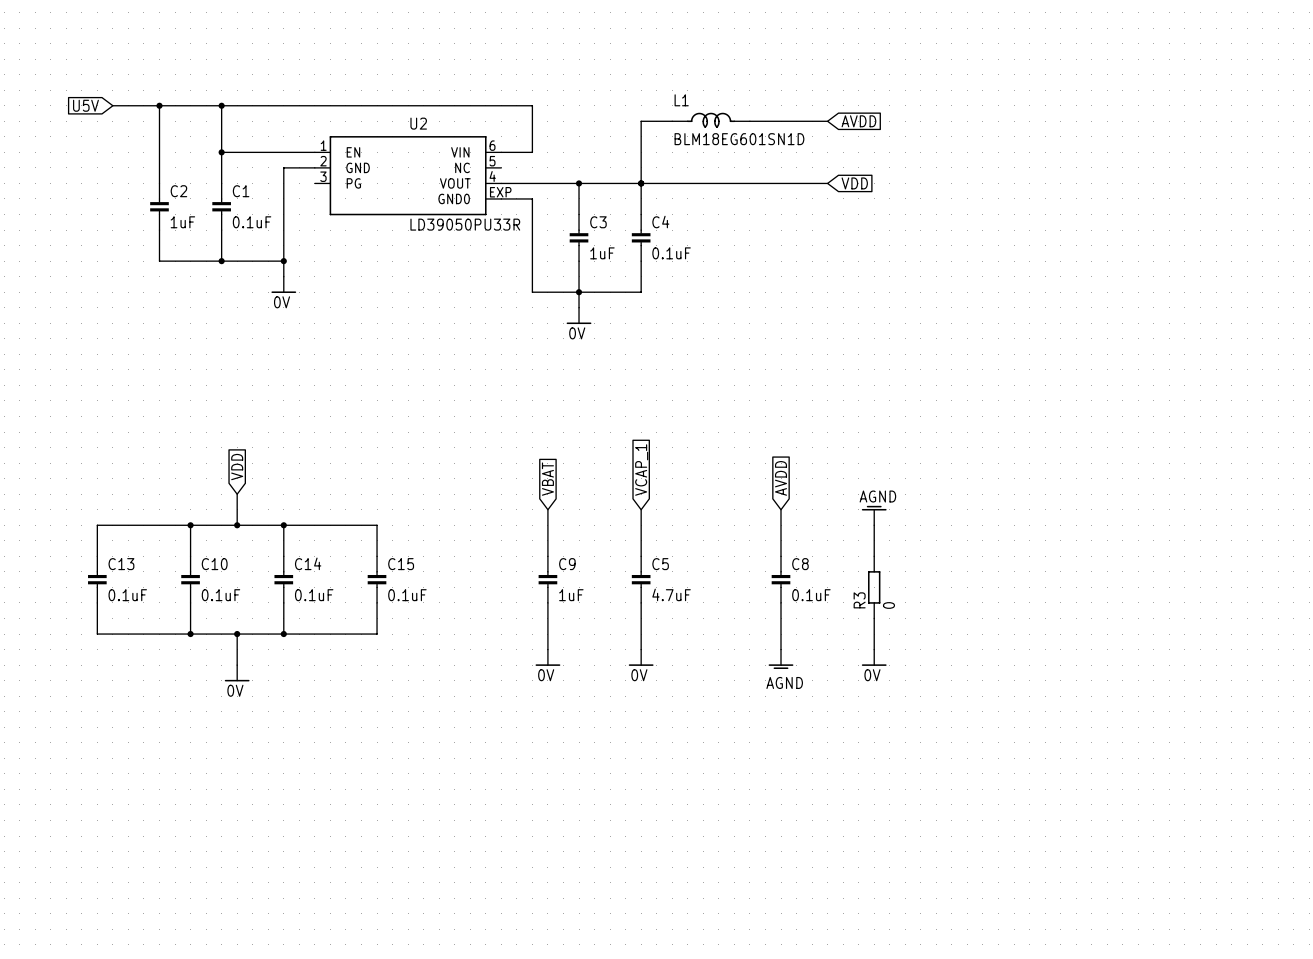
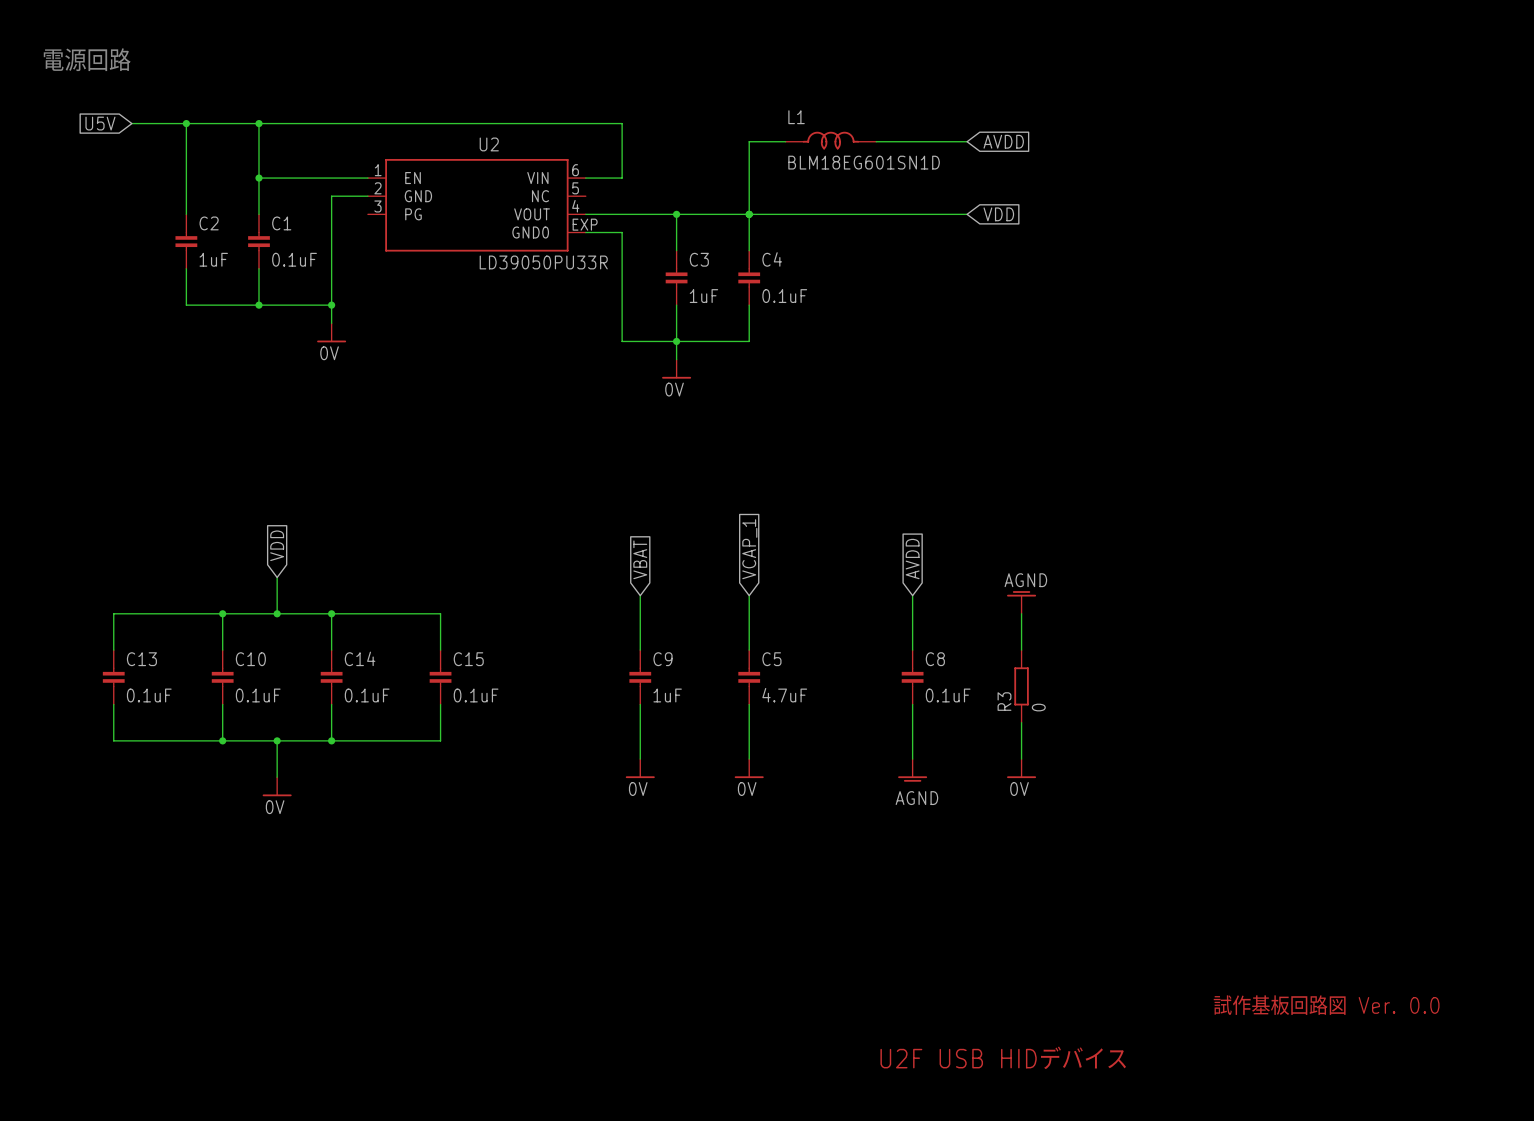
text: none -> 電源回路 (87, 59)
text: none -> 試作基板回路図 Ver. 0.0 (1326, 1005)
text: none -> U2F USB HIDデバイス (1003, 1057)

